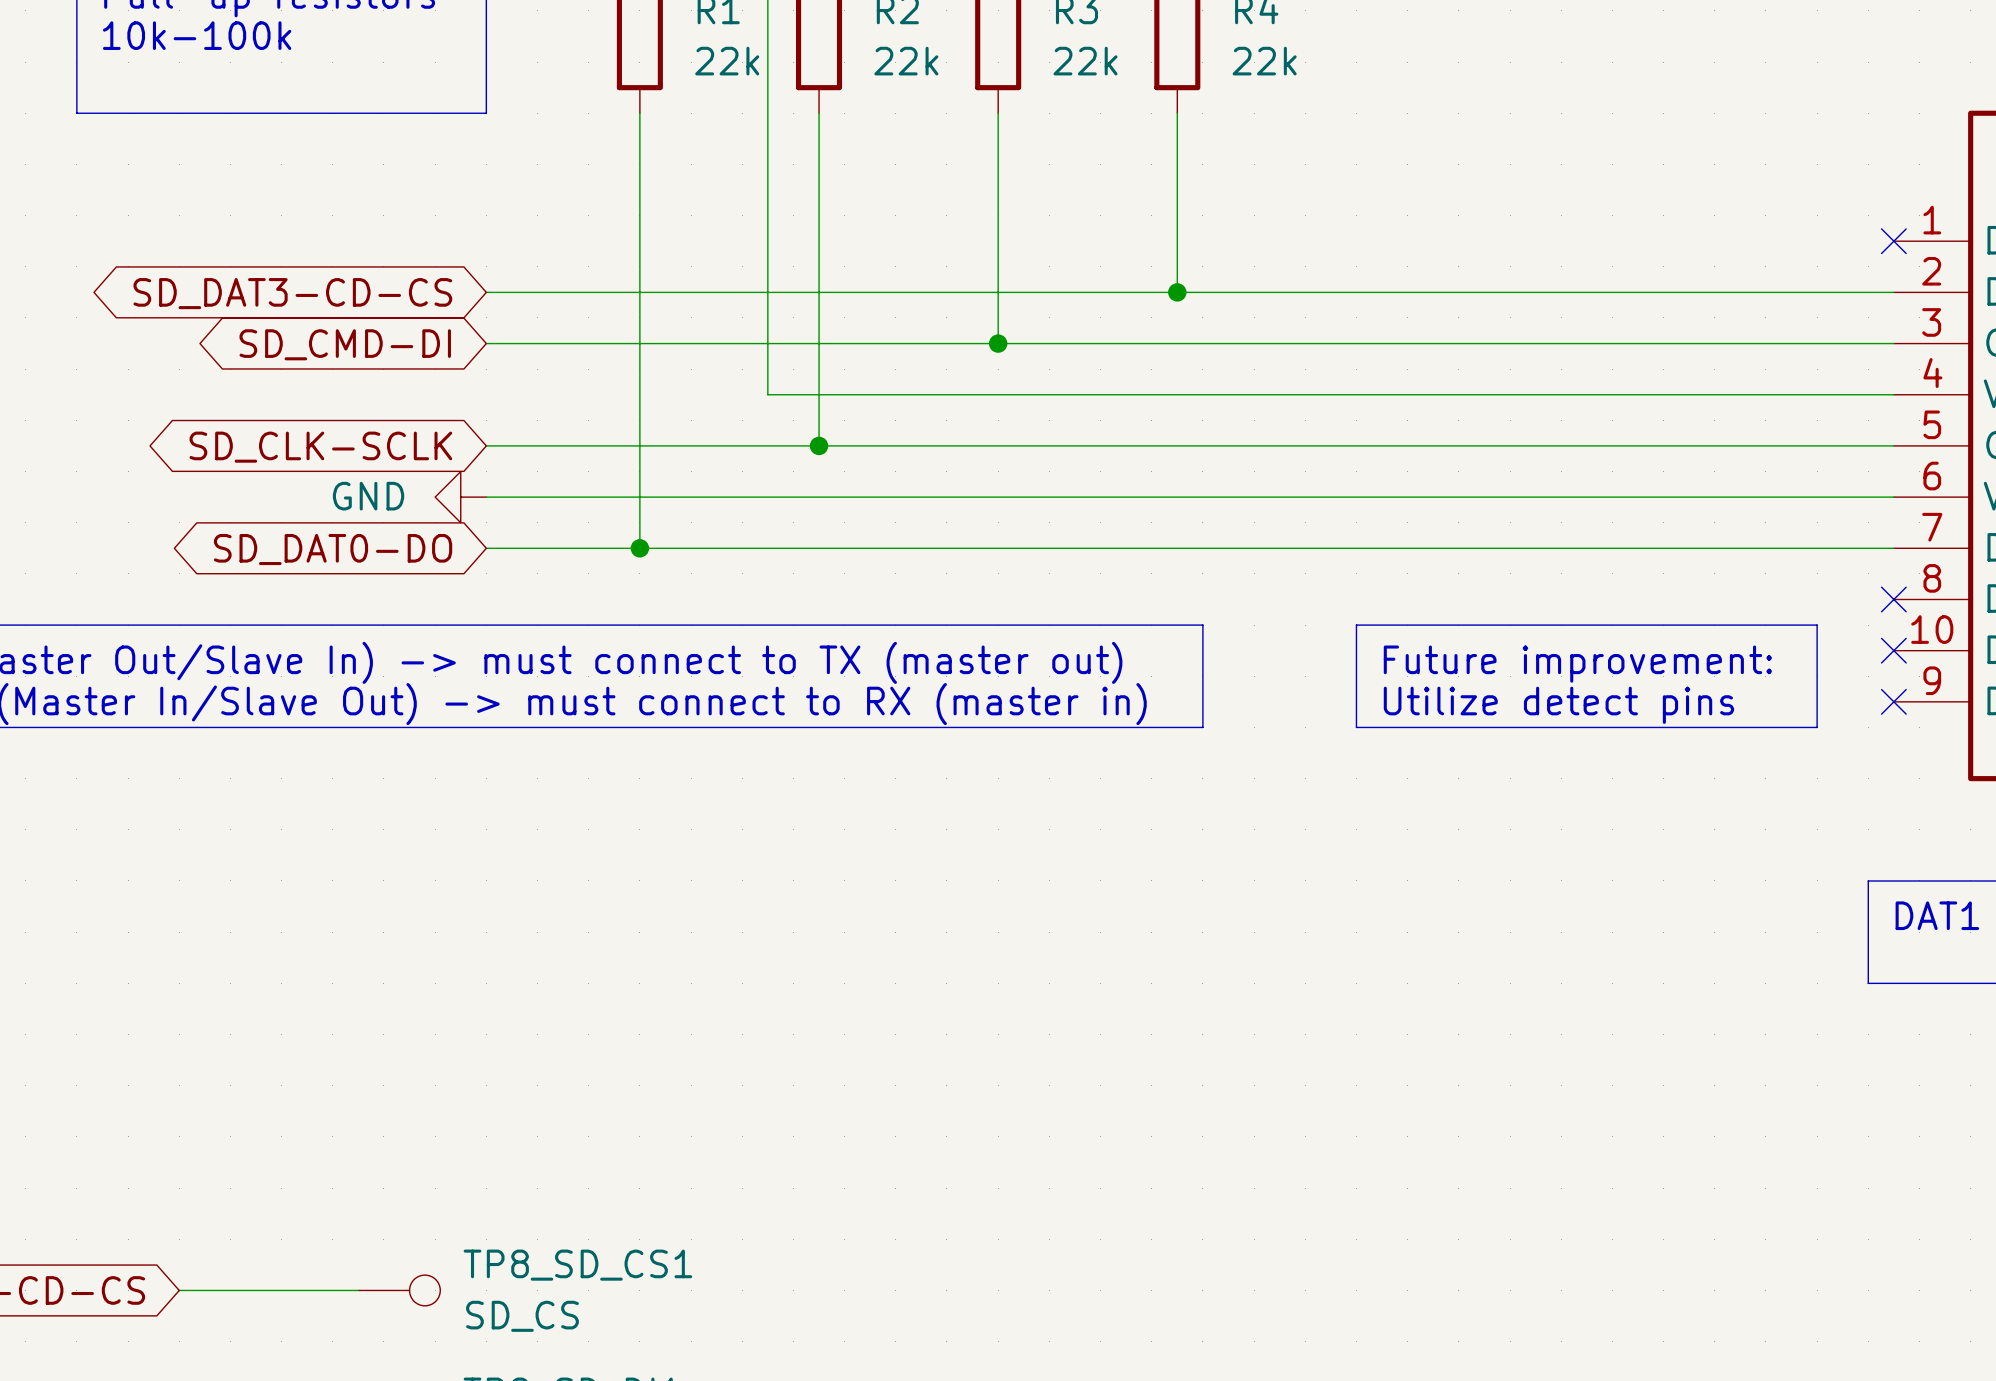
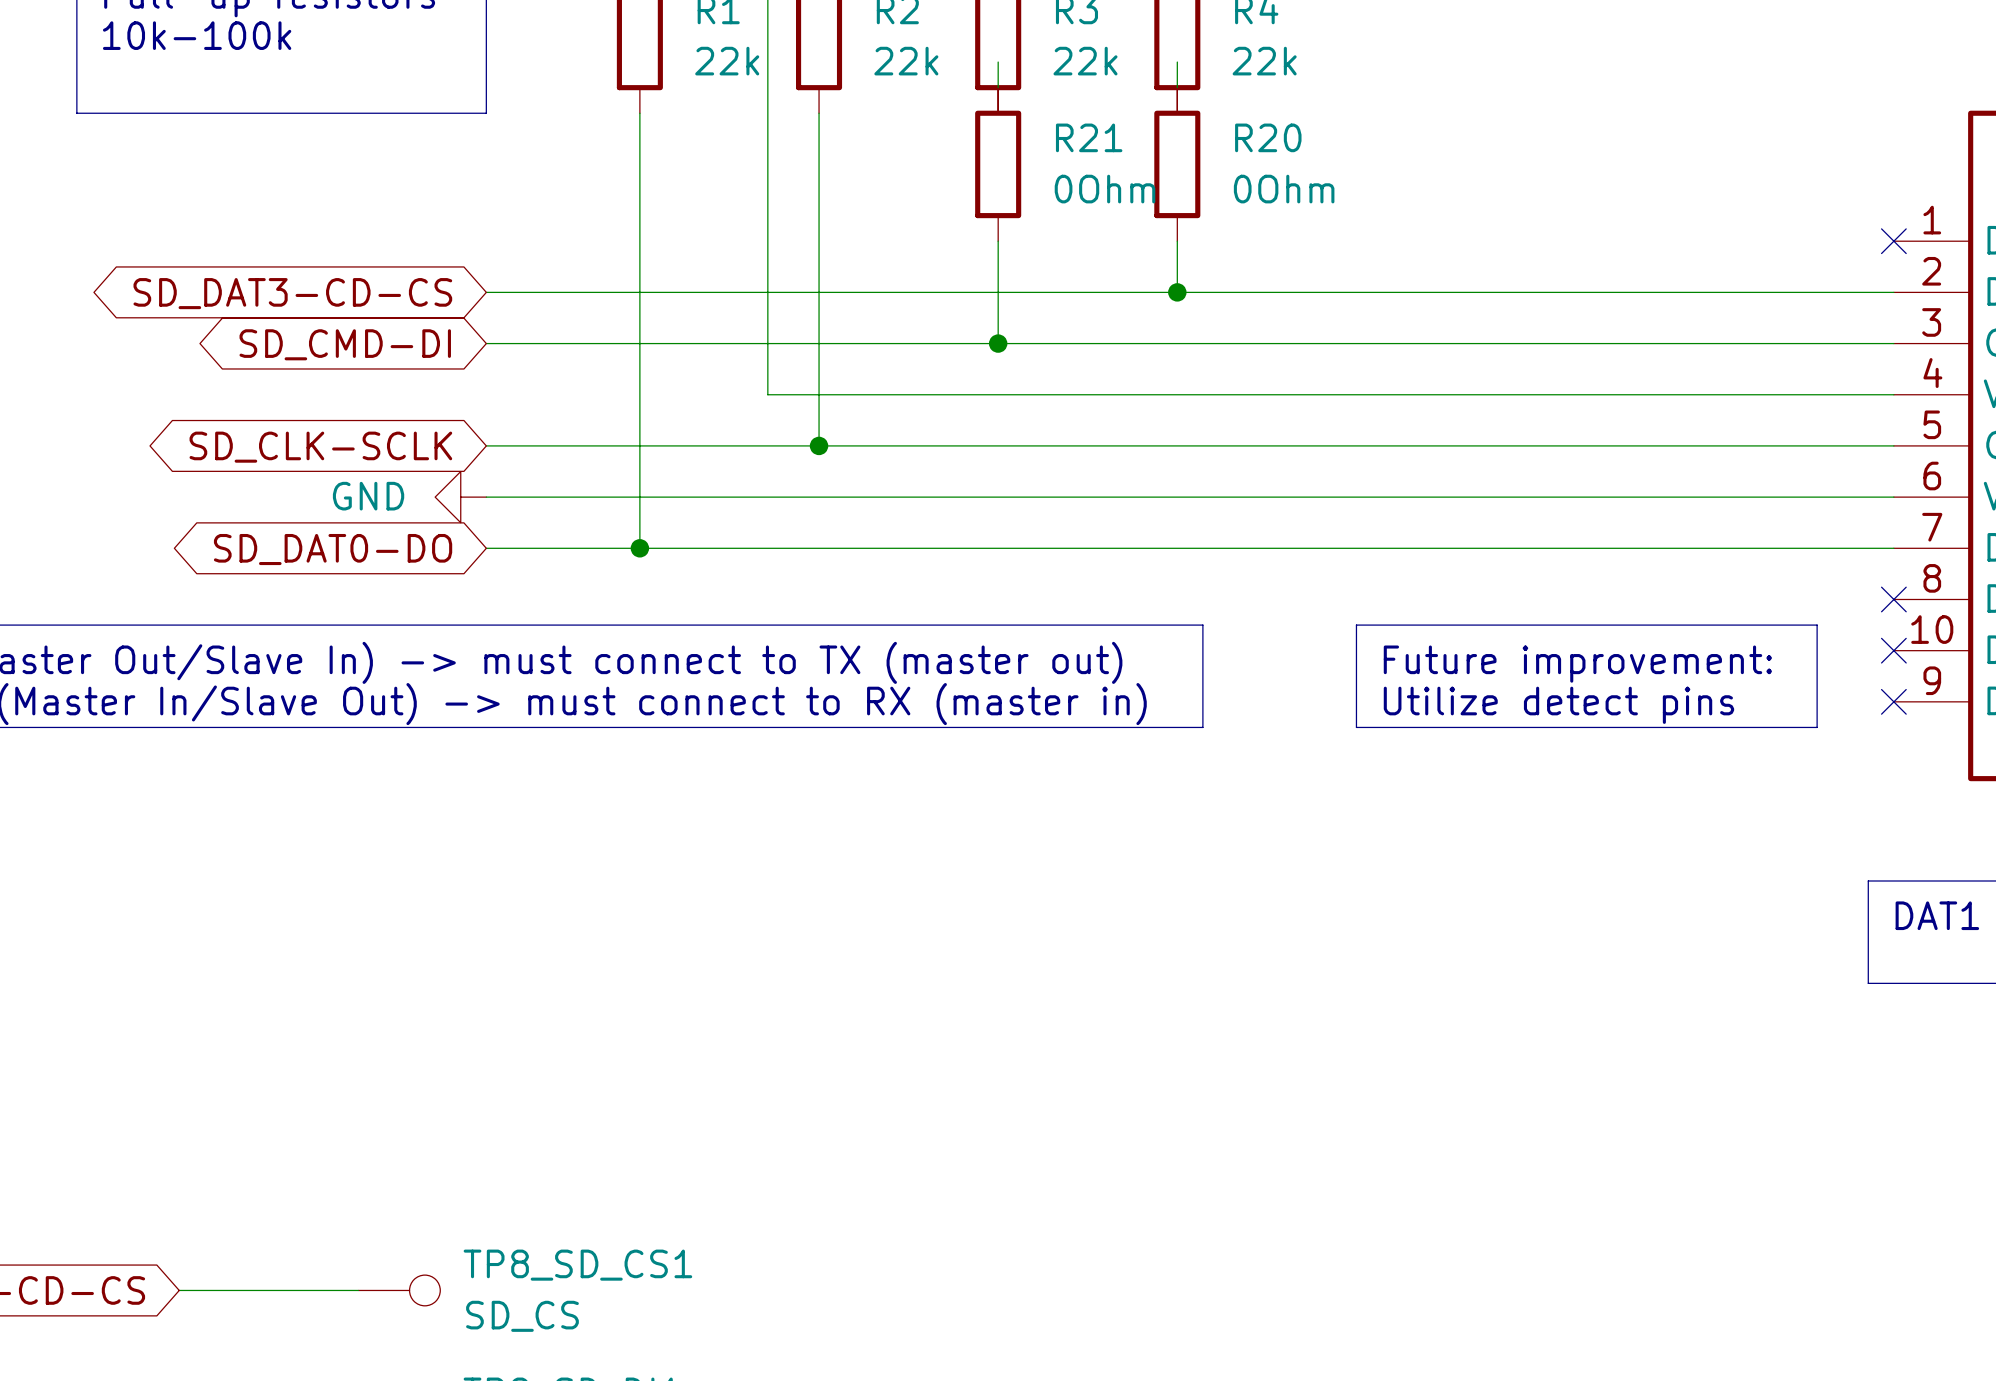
wire: none -> (998, 62) (998, 87)
wire: none -> (1177, 62) (1177, 87)
wire: (998, 113) (998, 241) -> none
wire: (1177, 113) (1177, 241) -> none
R21: none -> 0Ohm (998, 164)
R20: none -> 0Ohm (1177, 164)

